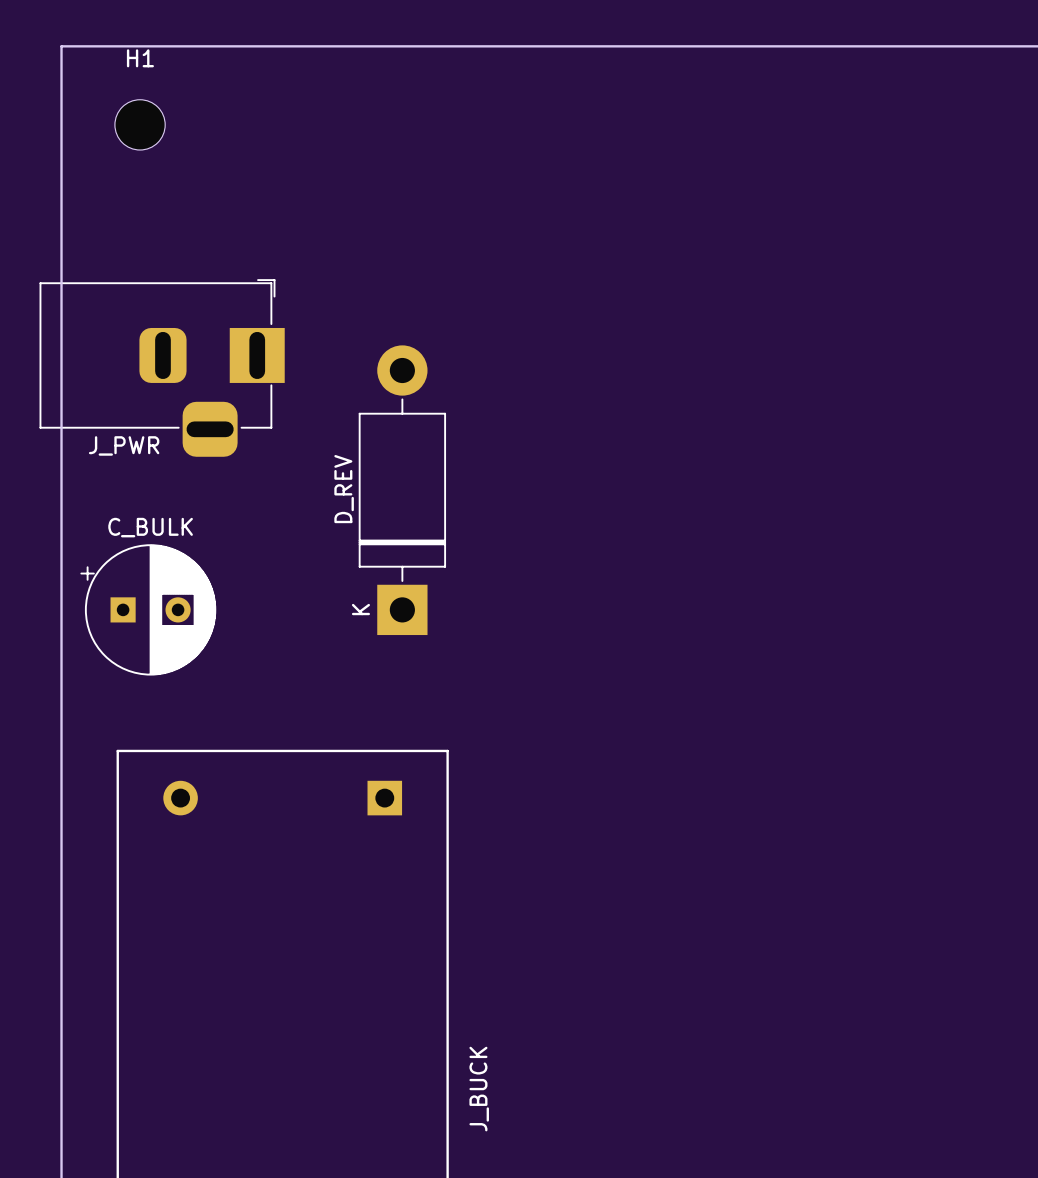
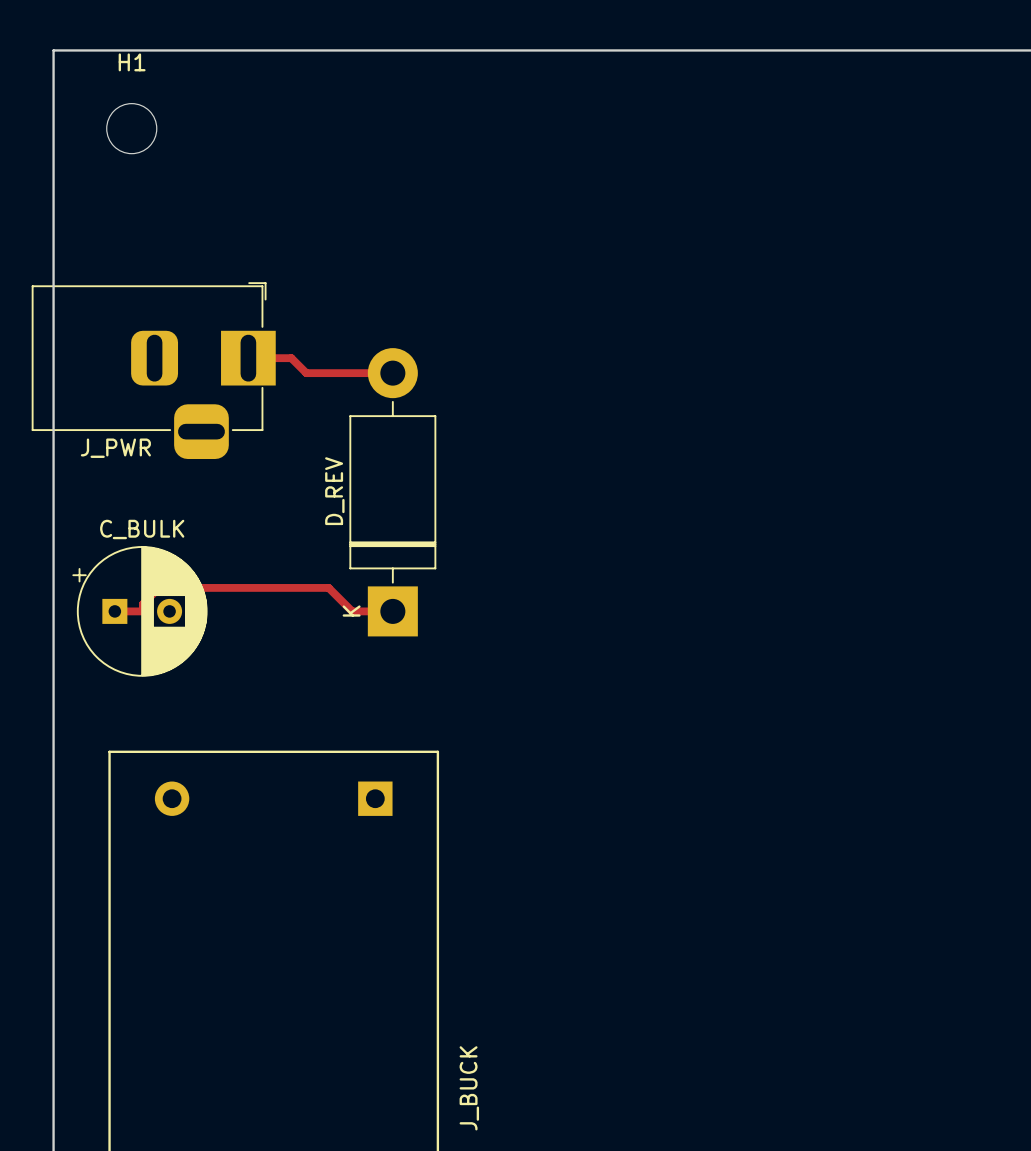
track: none -> (248, 358) (291, 358) (306, 373) (392, 373)
track: none -> (114, 611) (143, 611) (143, 604) (159, 587) (328, 587) (352, 611) (392, 611)

